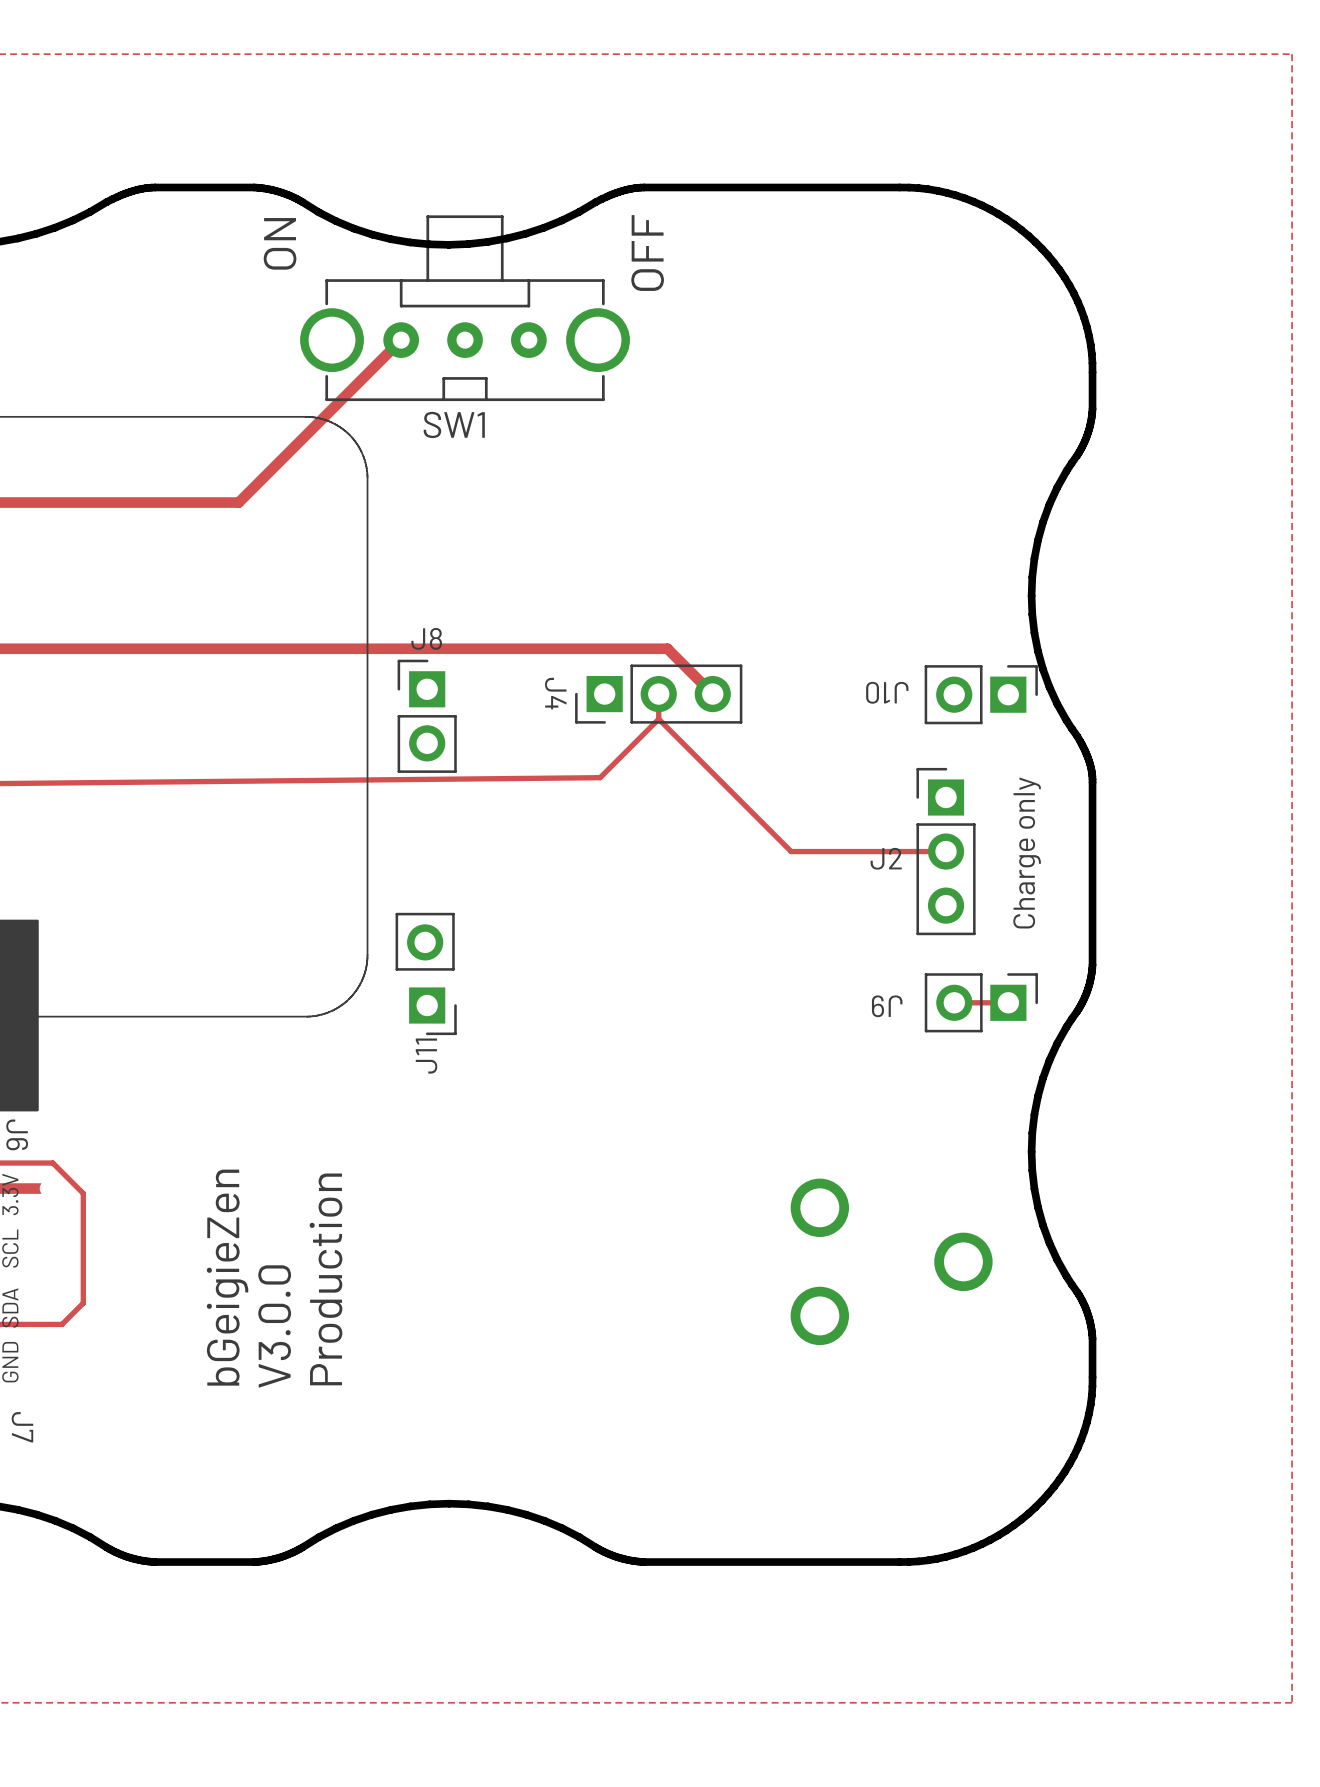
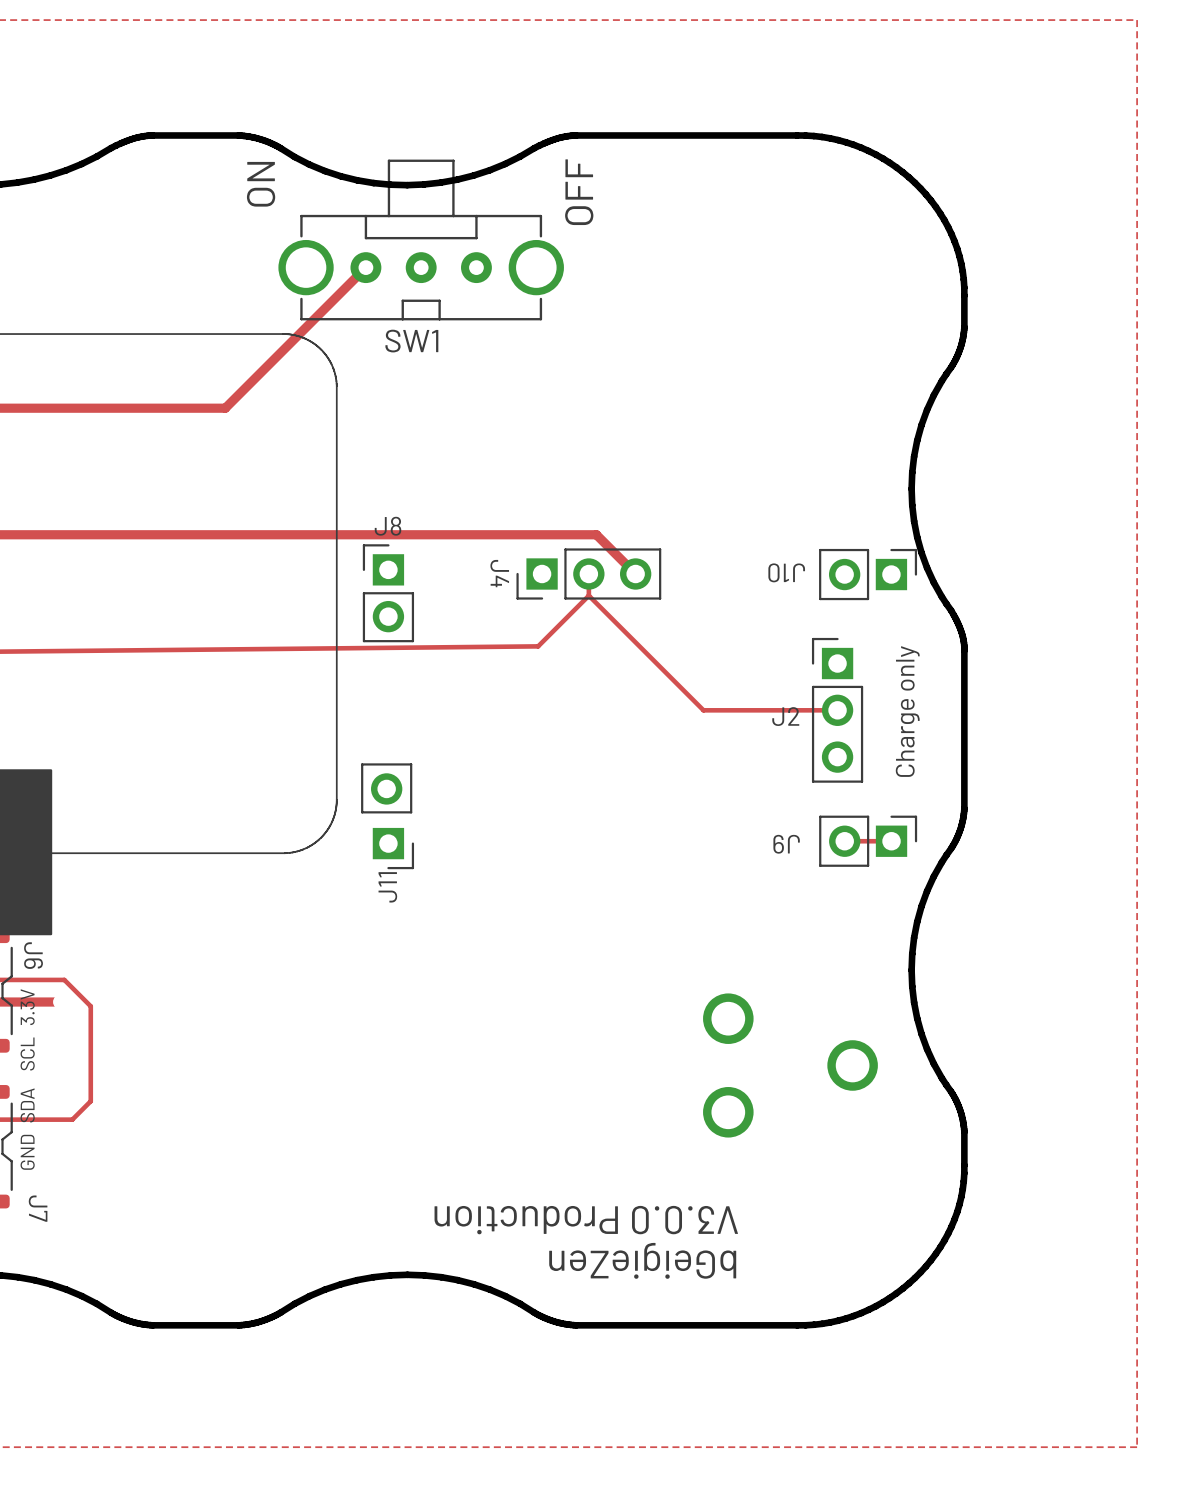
text: bGeigieZen (227, 1277) -> none
text: Production (325, 1279) -> none
text: V3.0.0 (274, 1326) -> none
text: none -> V3.0.0 Production (586, 1220)
text: none -> bGeigieZen (642, 1260)

